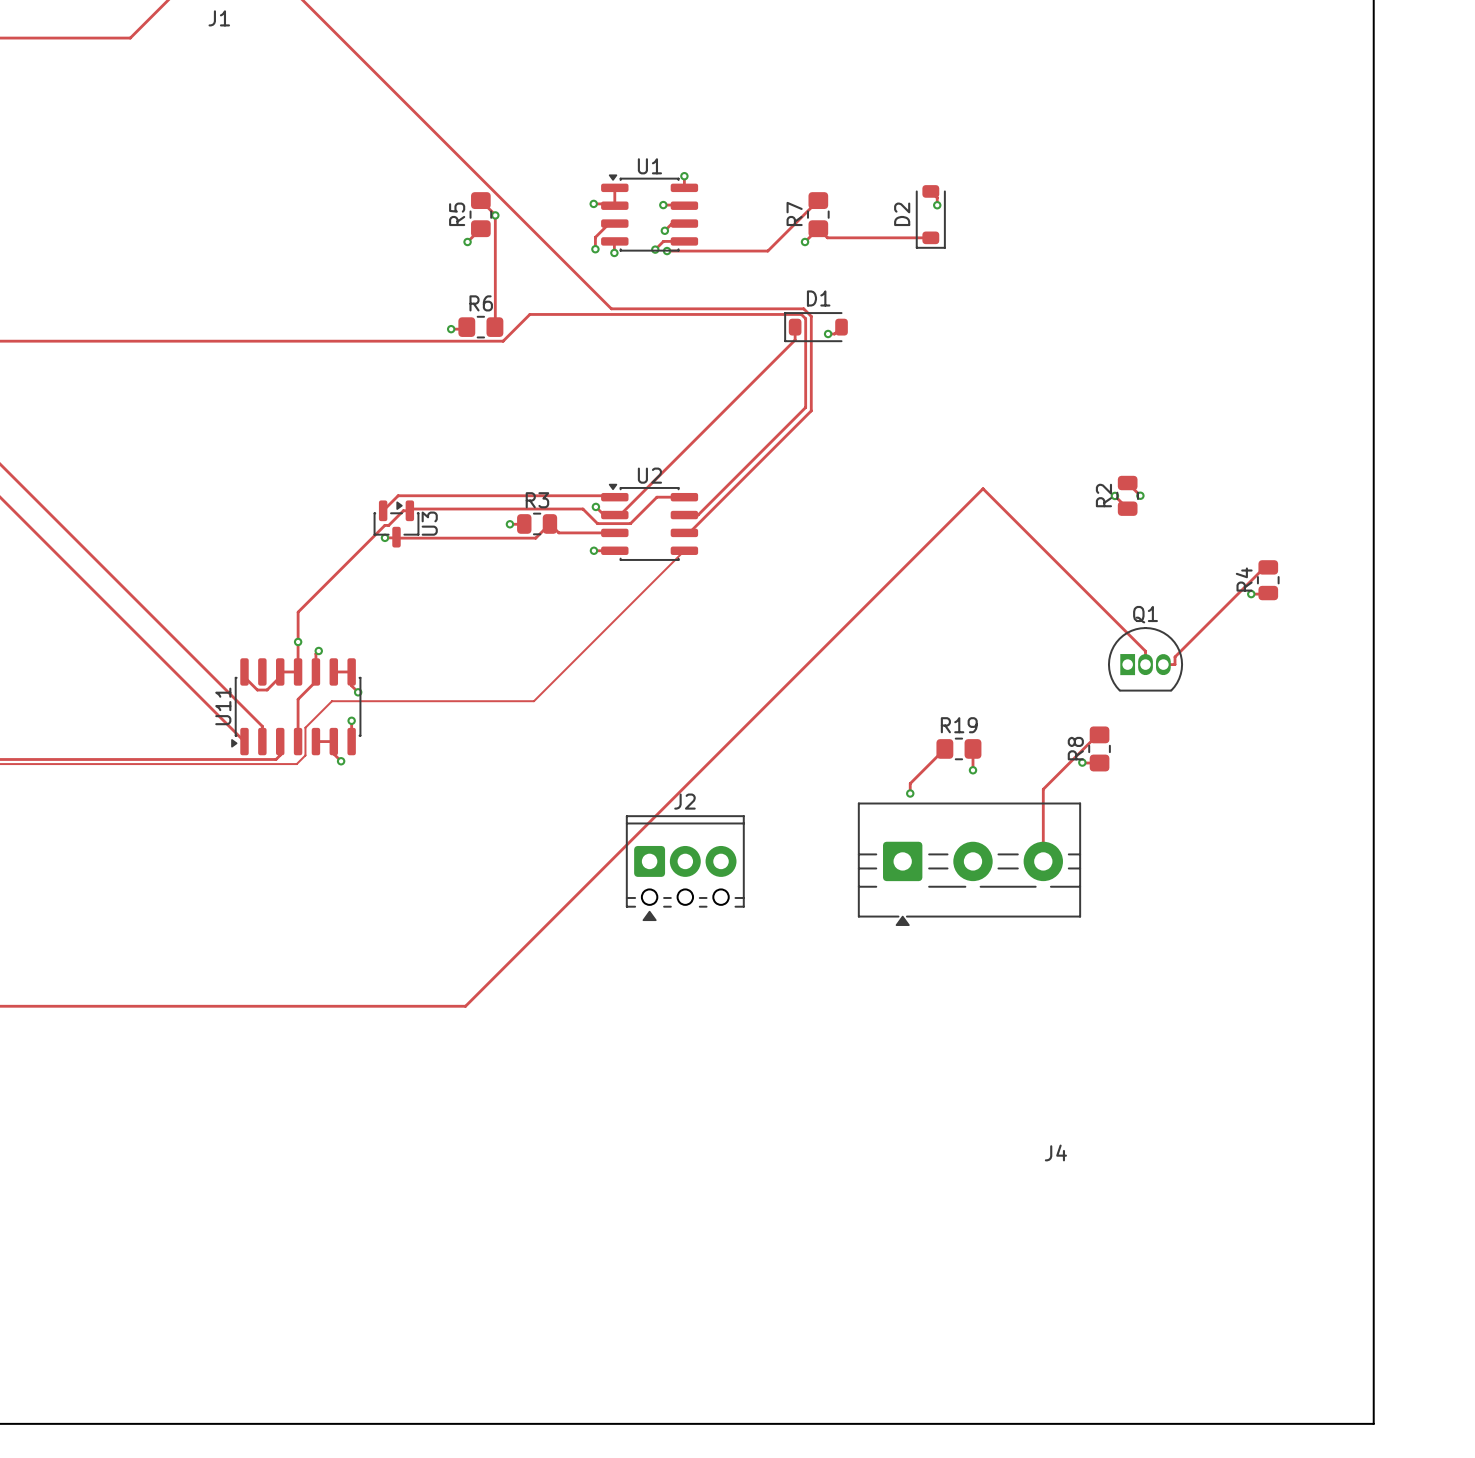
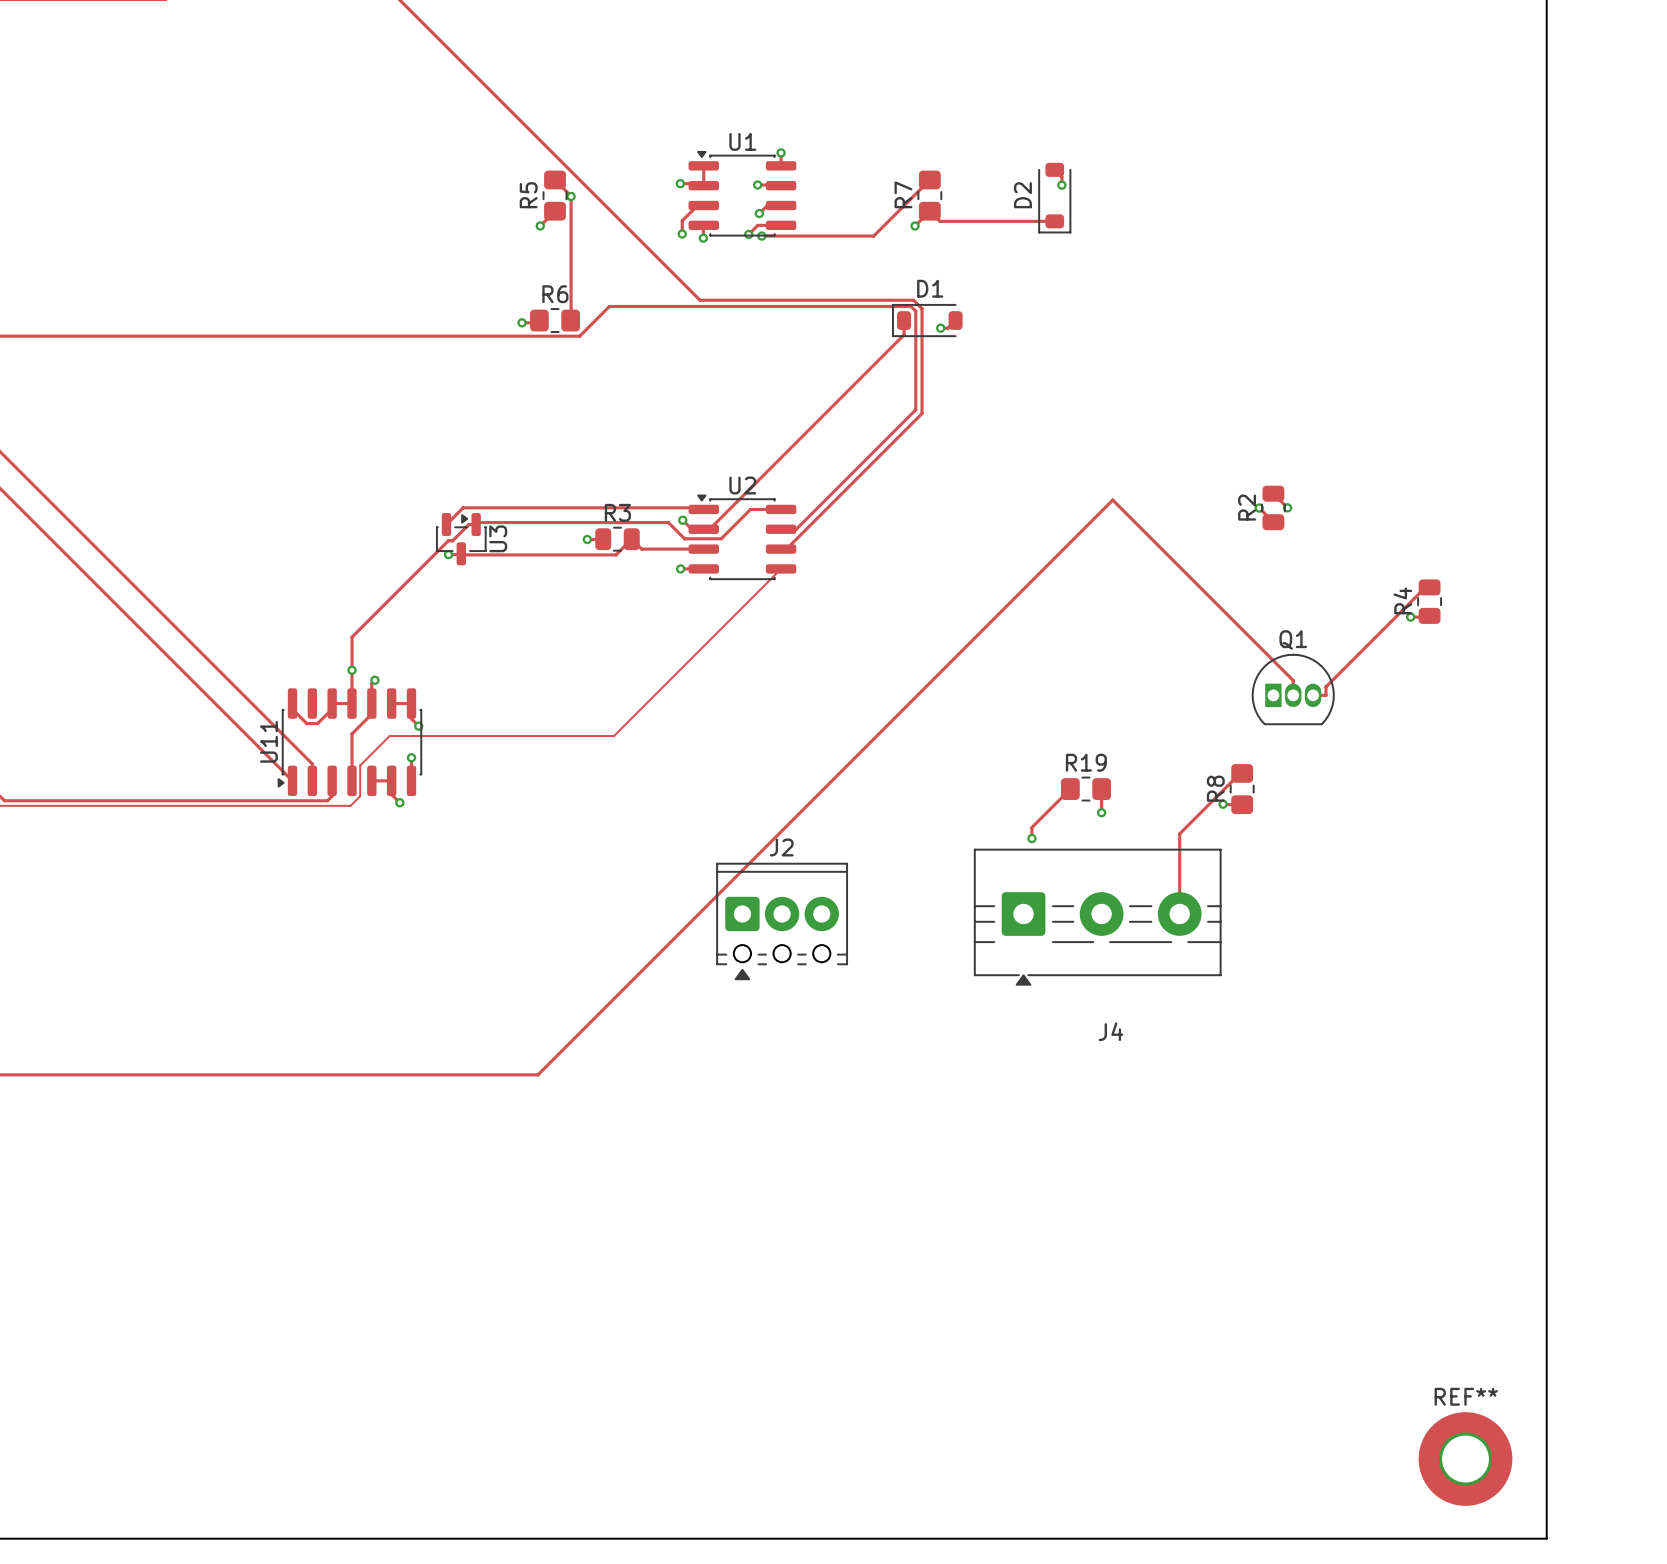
J4 name position: J4 (1055, 1152) -> J4 (1110, 1031)
REF**: none -> (1465, 1459)

